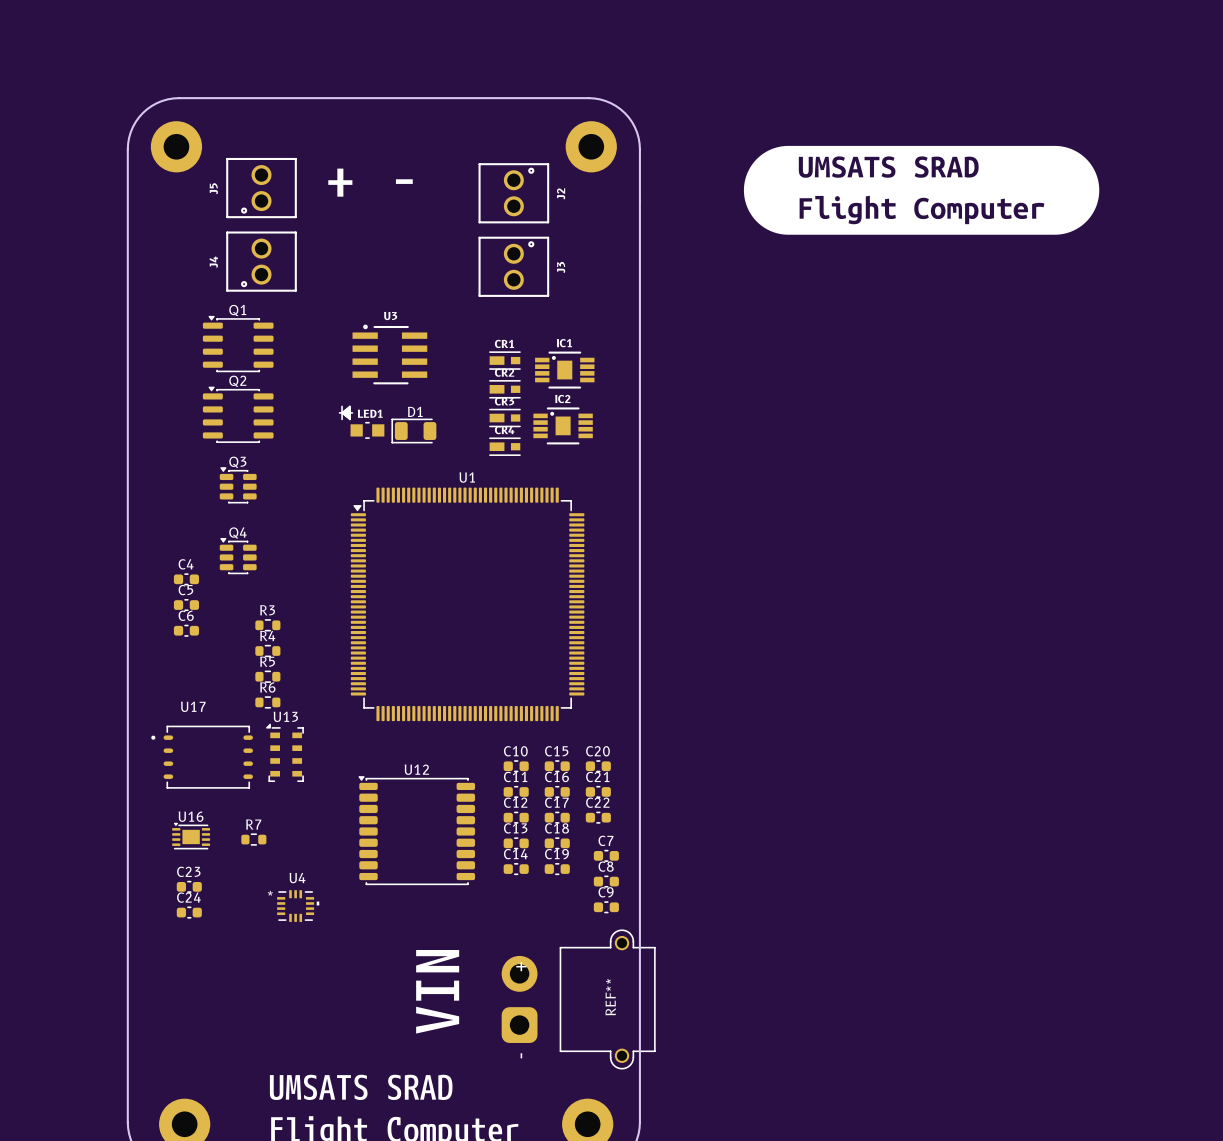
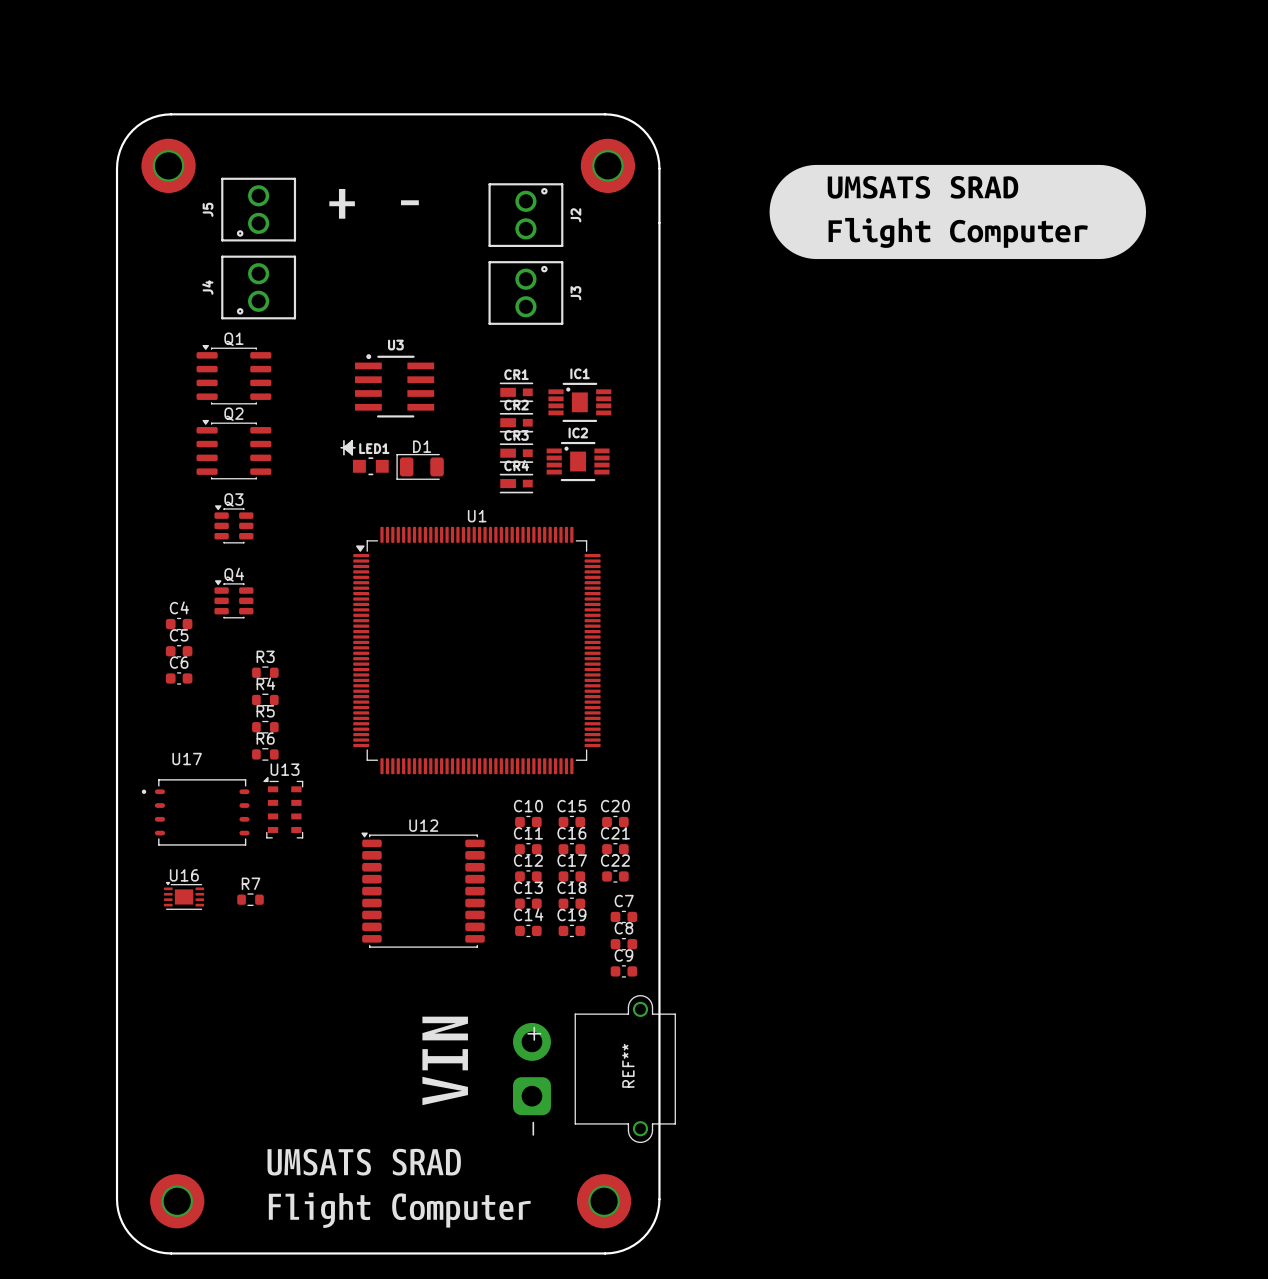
C23: (189, 886) -> none
U4: (298, 906) -> none
C24: (189, 912) -> none

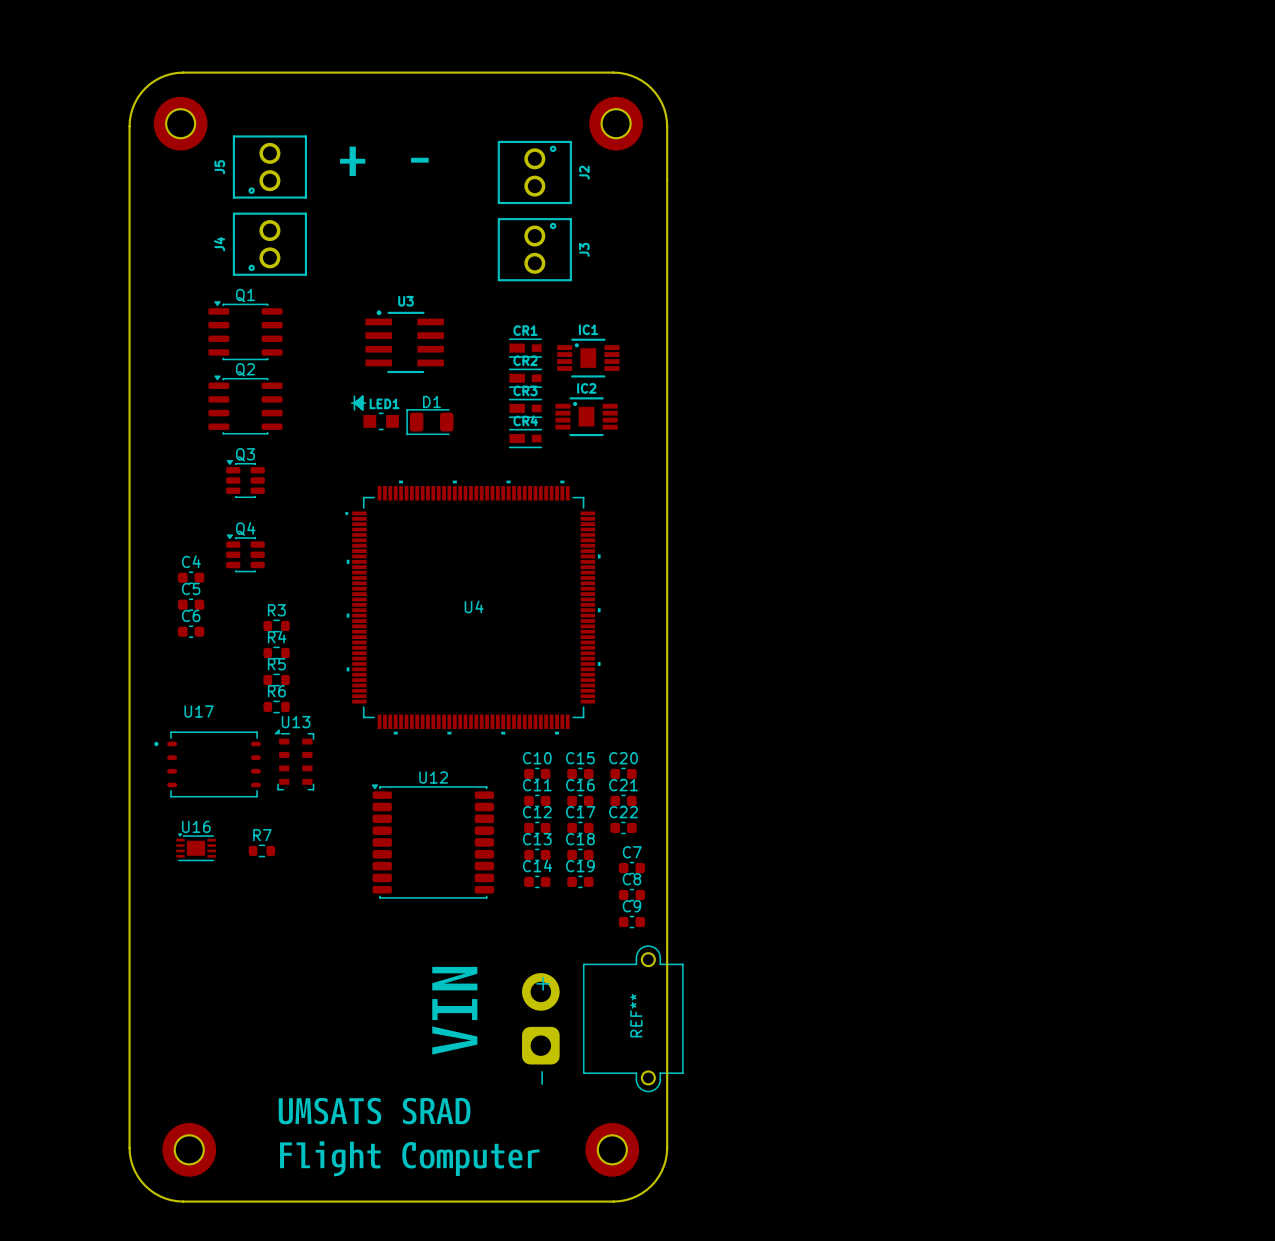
drawing: [769, 164, 1146, 260] -> none
U1: (476, 650) -> none
U4: none -> (472, 607)

